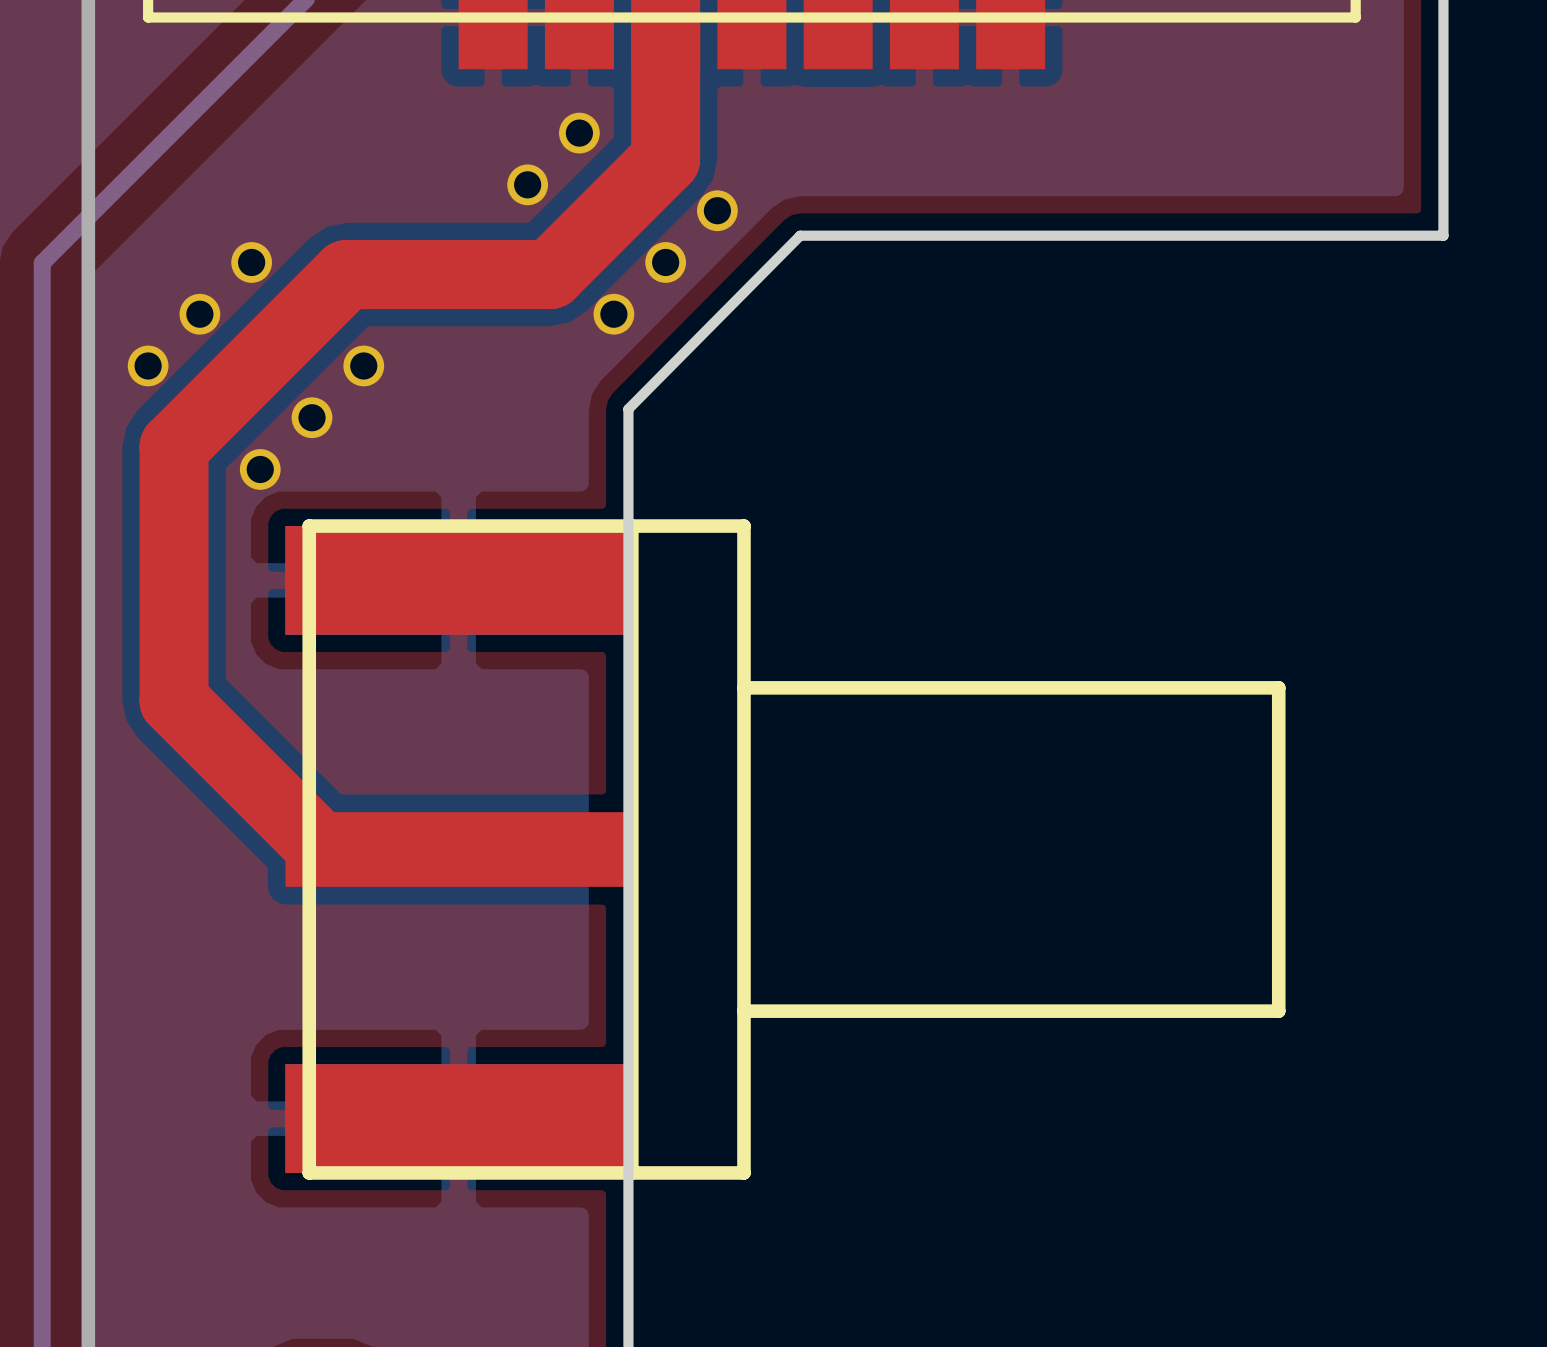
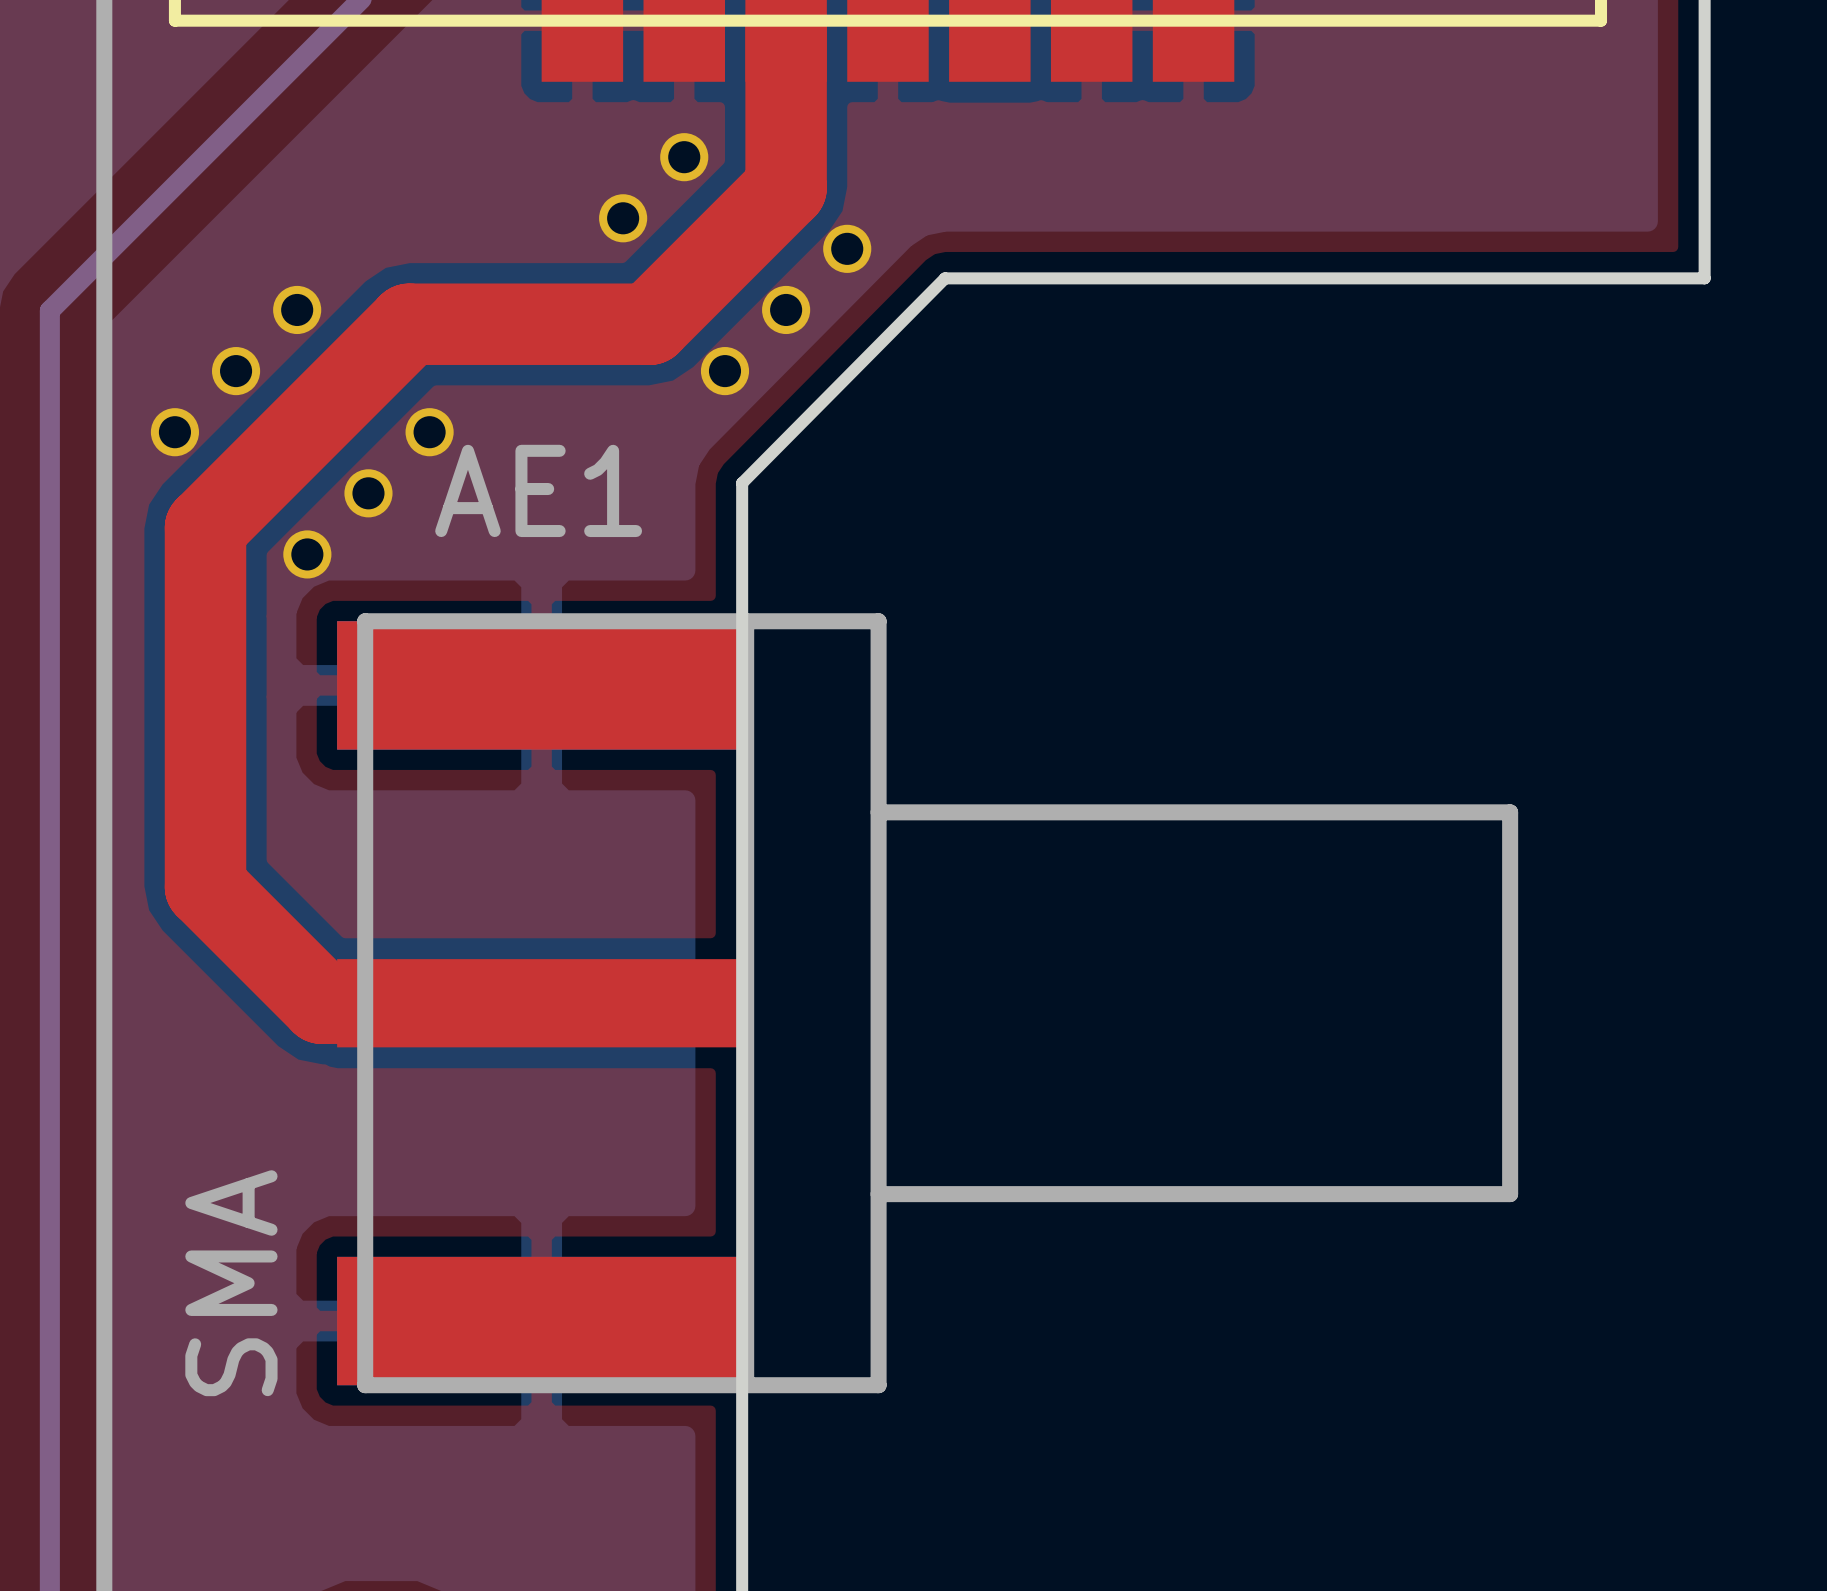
top track: (174, 700) (322, 849) -> (205, 827) (205, 886) (321, 1003) (381, 1003)
part: (785, 849) -> none
AE1: none -> SMA (927, 1003)

